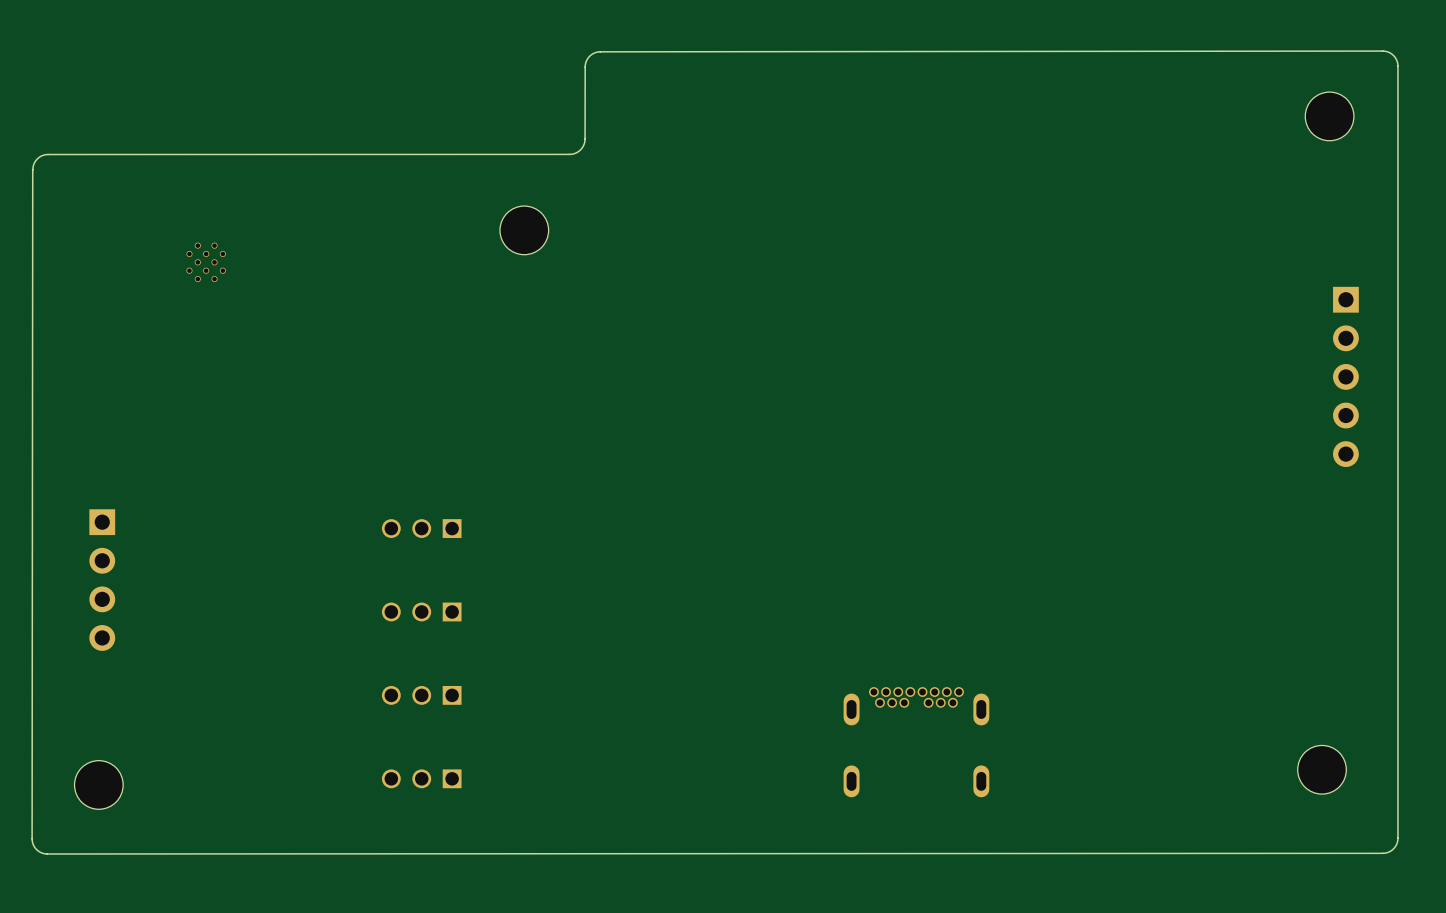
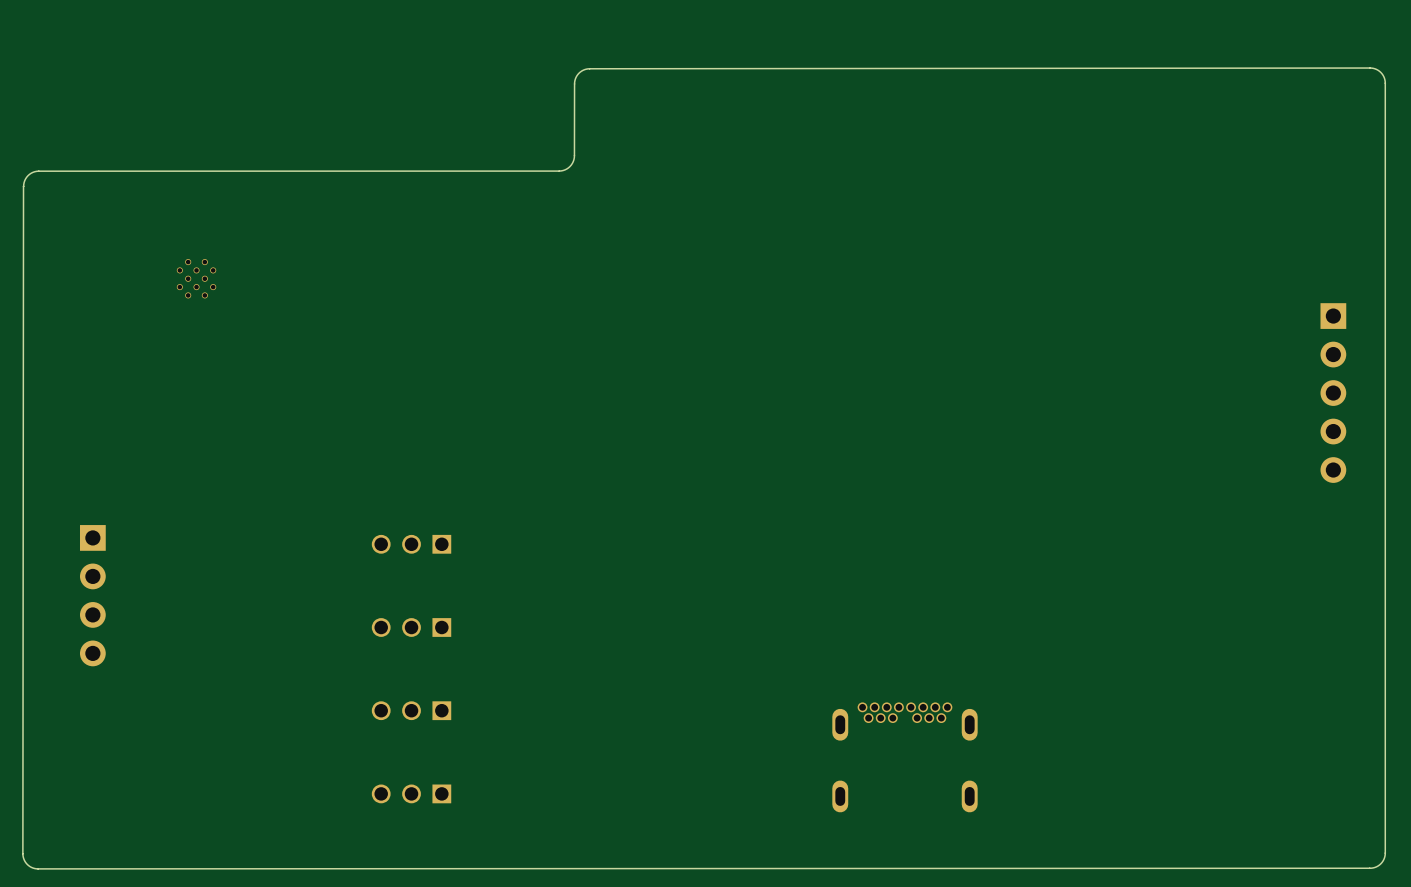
part: (1329, 116) -> none
part: (524, 230) -> none
part: (1322, 769) -> none
part: (98, 784) -> none

